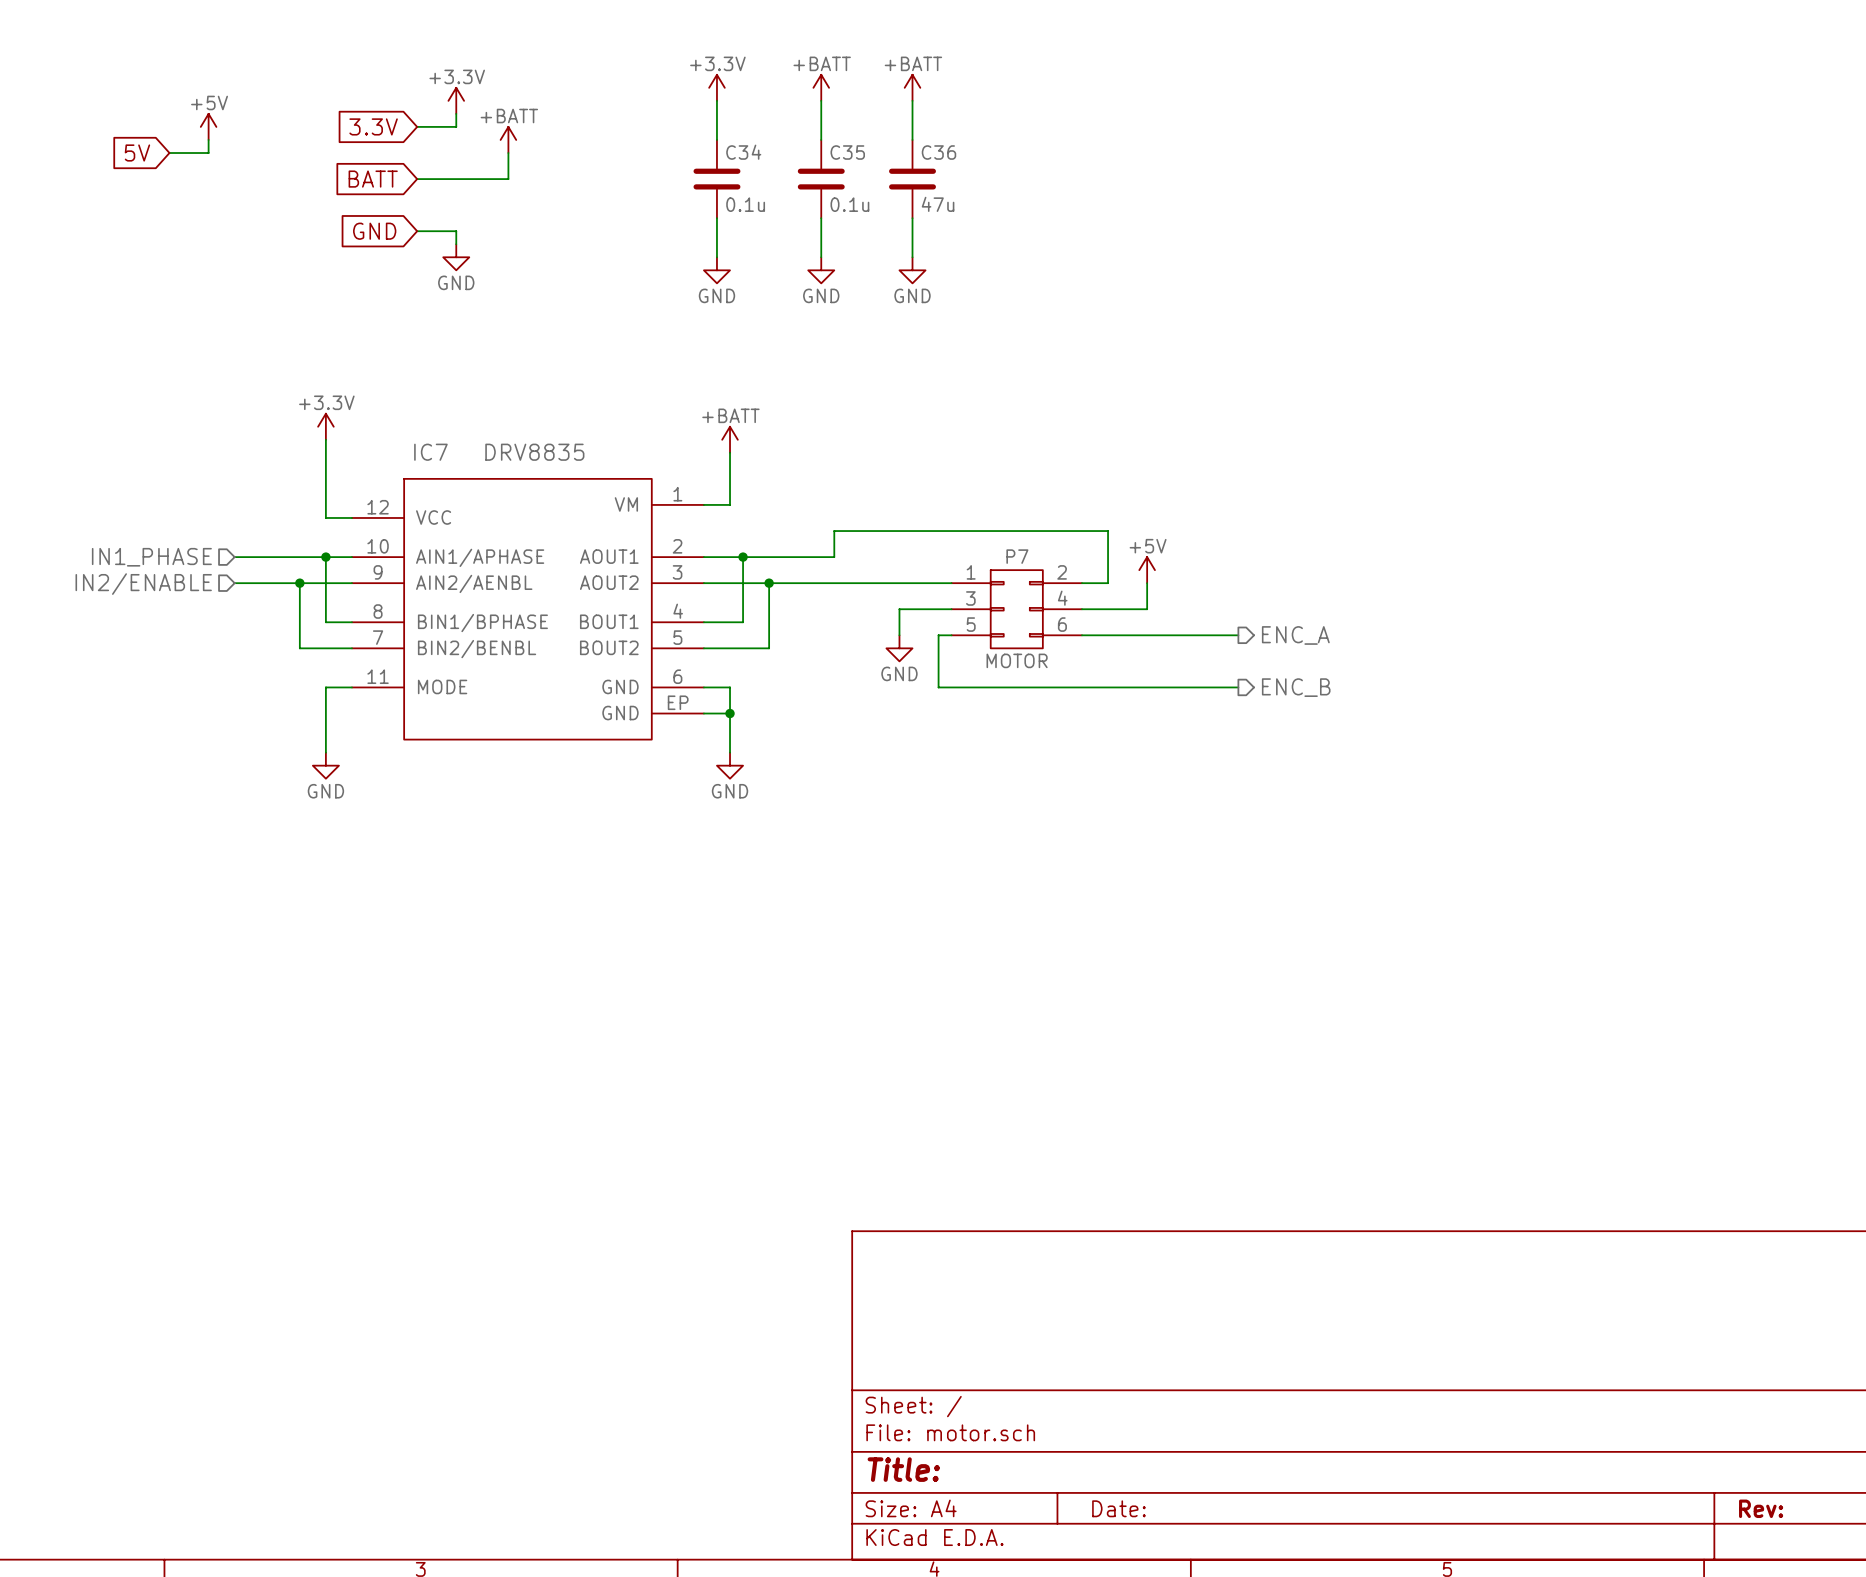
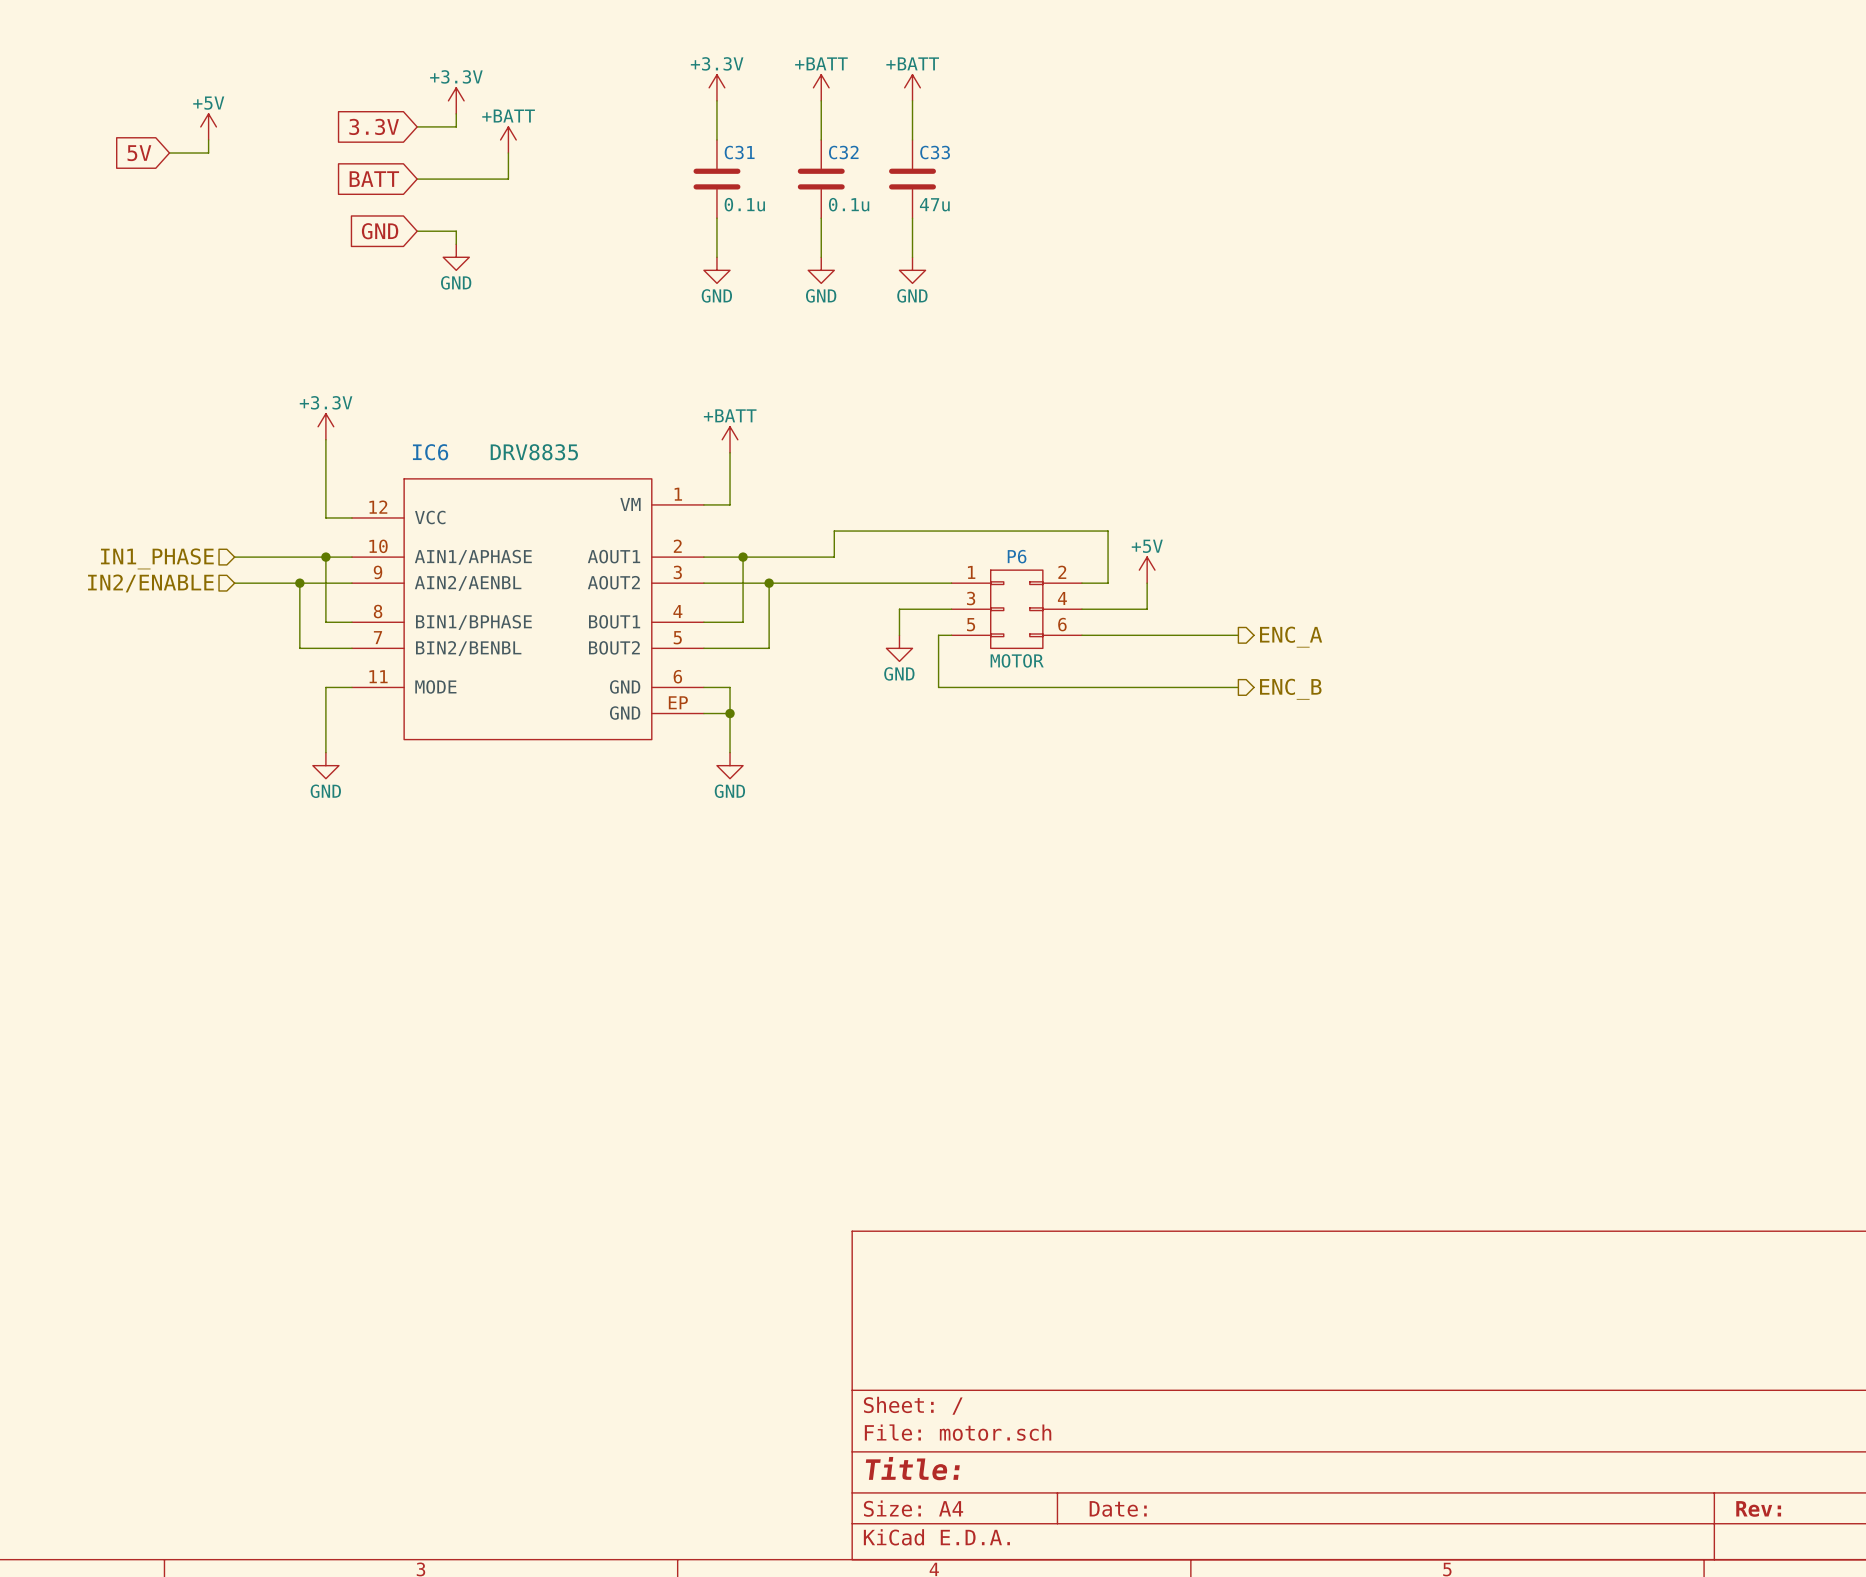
C34 name: C34 (743, 152) -> C31 (739, 152)
C35 name: C35 (847, 152) -> C32 (843, 152)
C36 name: C36 (938, 152) -> C33 (935, 152)
IC7 name: IC7 (430, 452) -> IC6 (430, 452)
P7 name: P7 (1017, 556) -> P6 (1017, 556)

